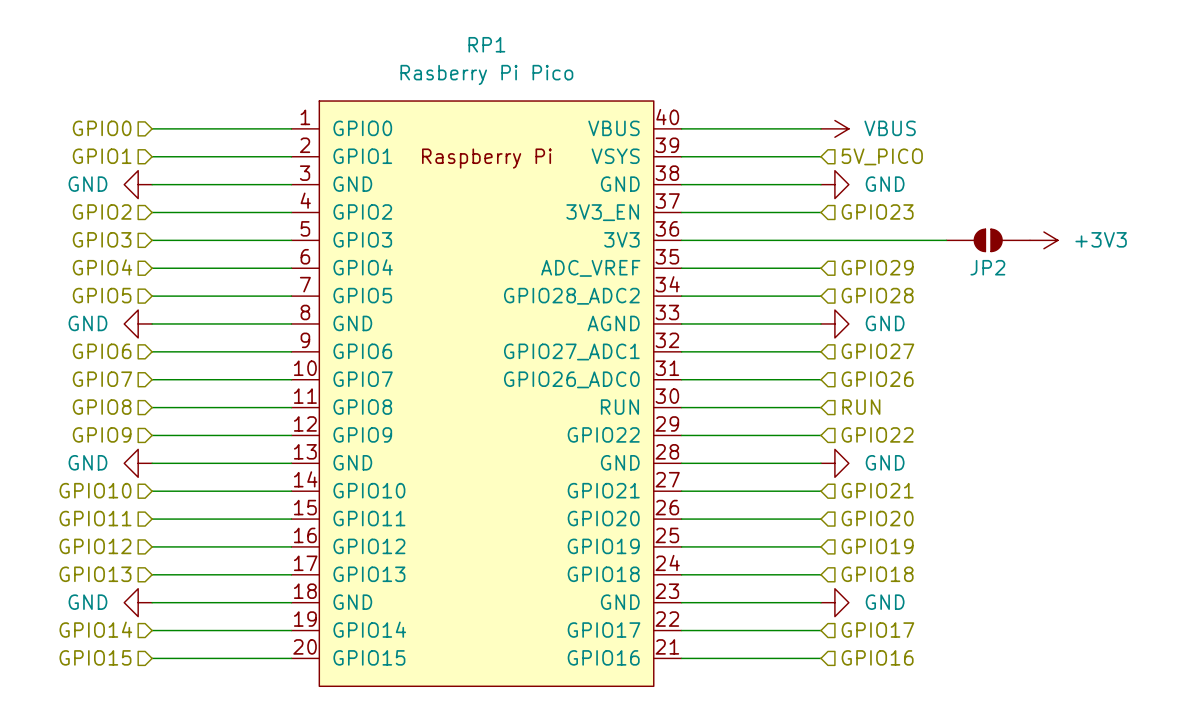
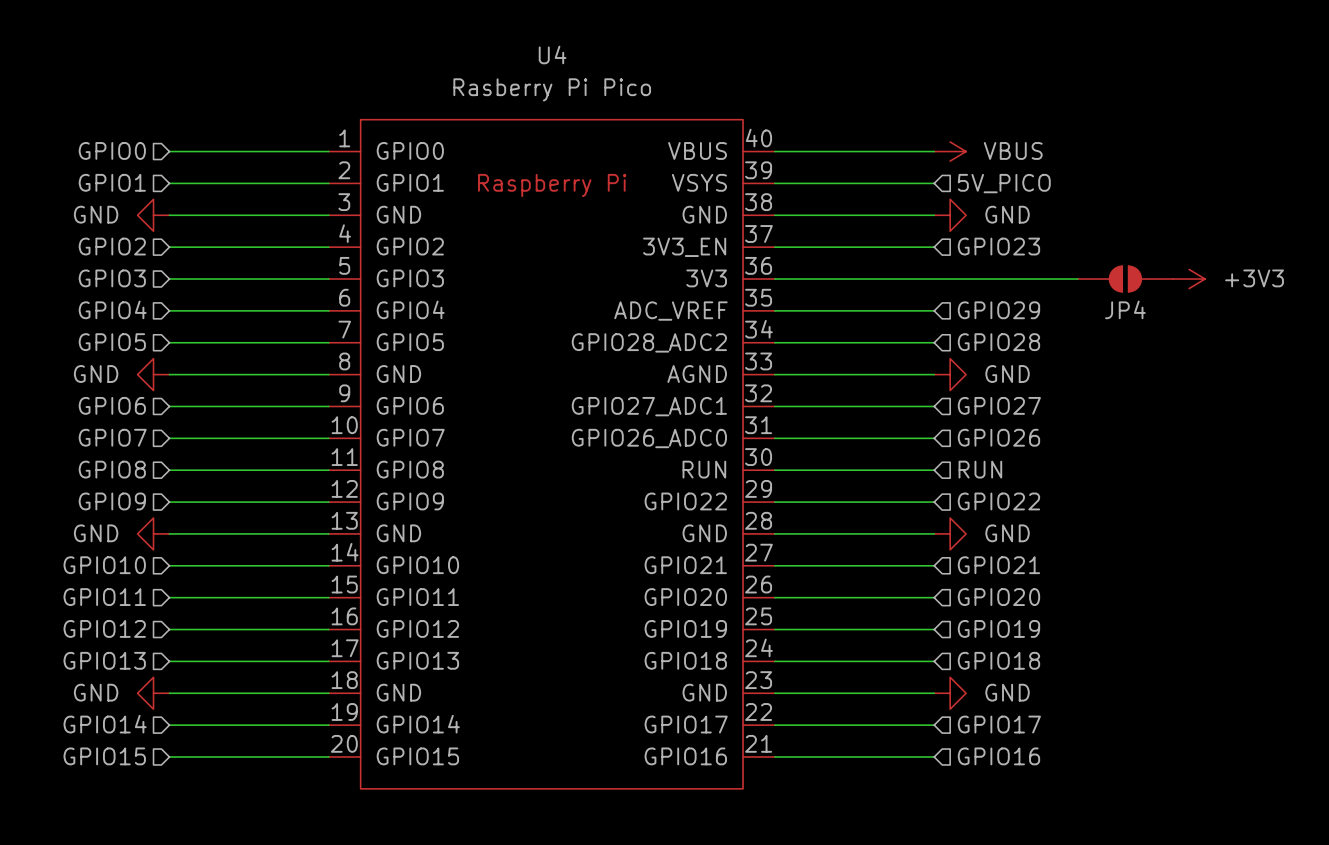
RP1 name: RP1 (486, 44) -> U4 (552, 54)
JP2 name: JP2 (987, 267) -> JP4 (1125, 309)

